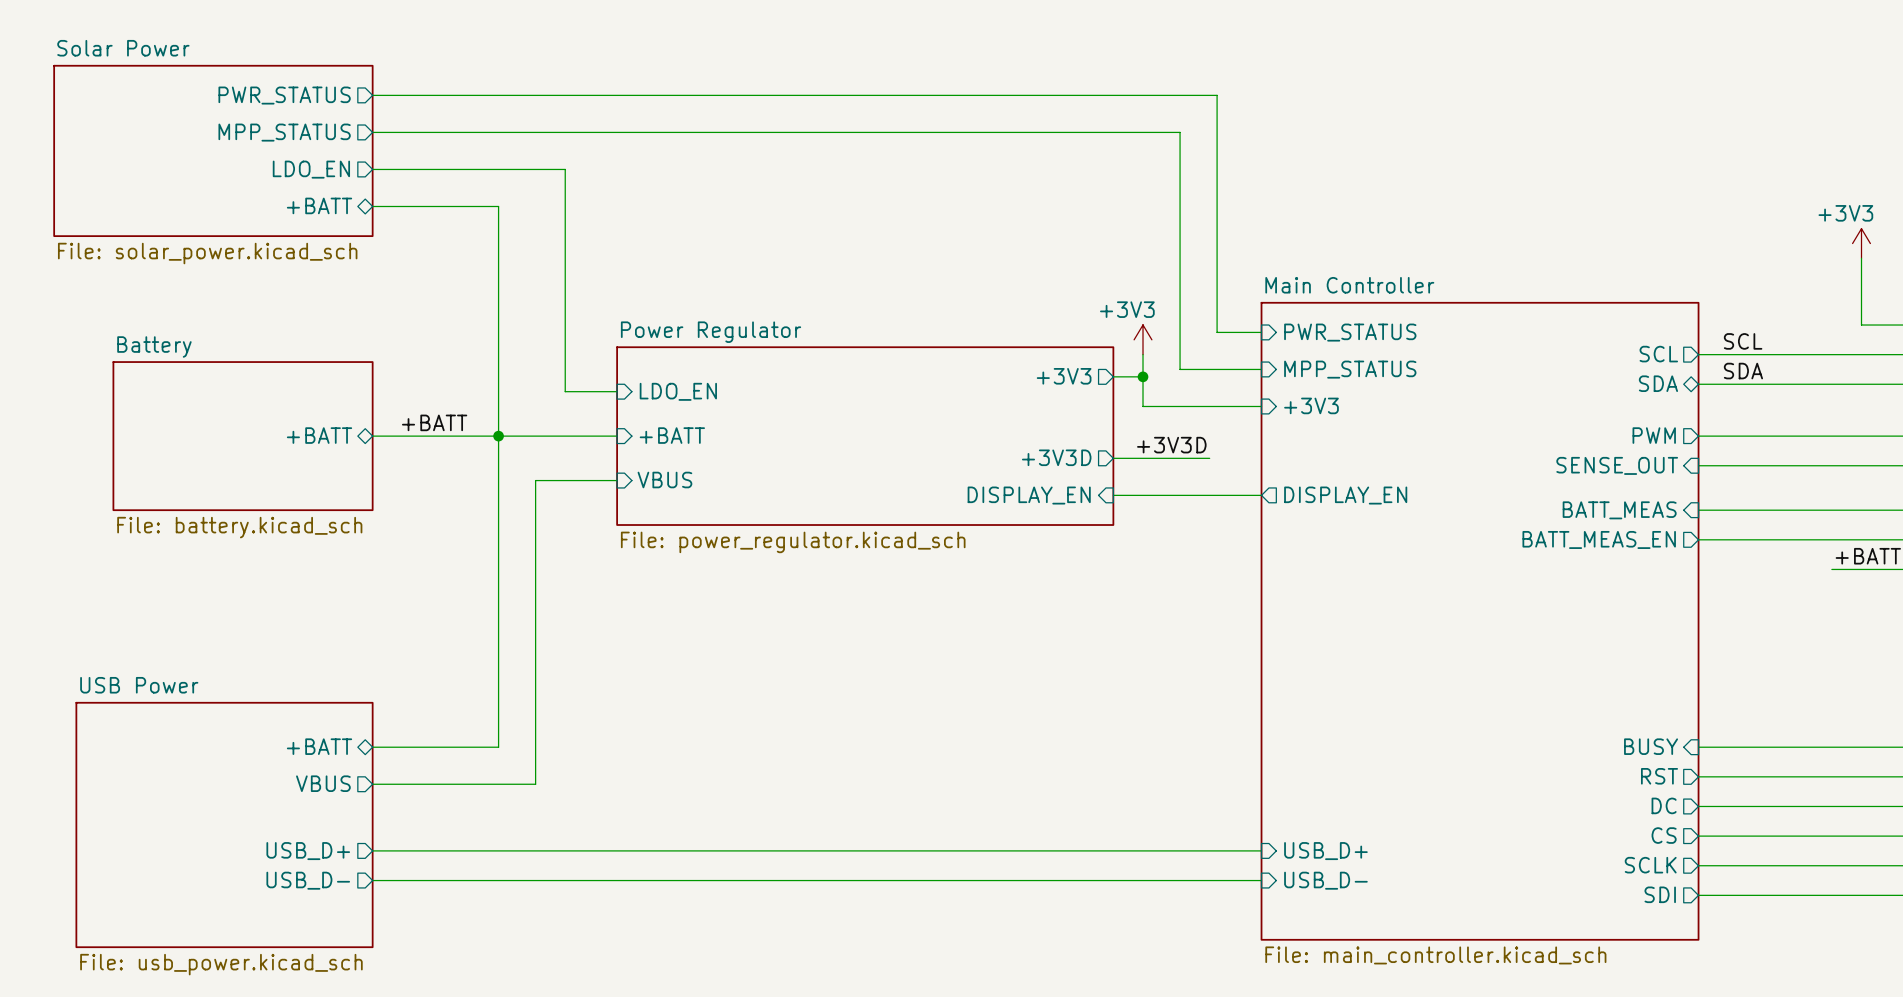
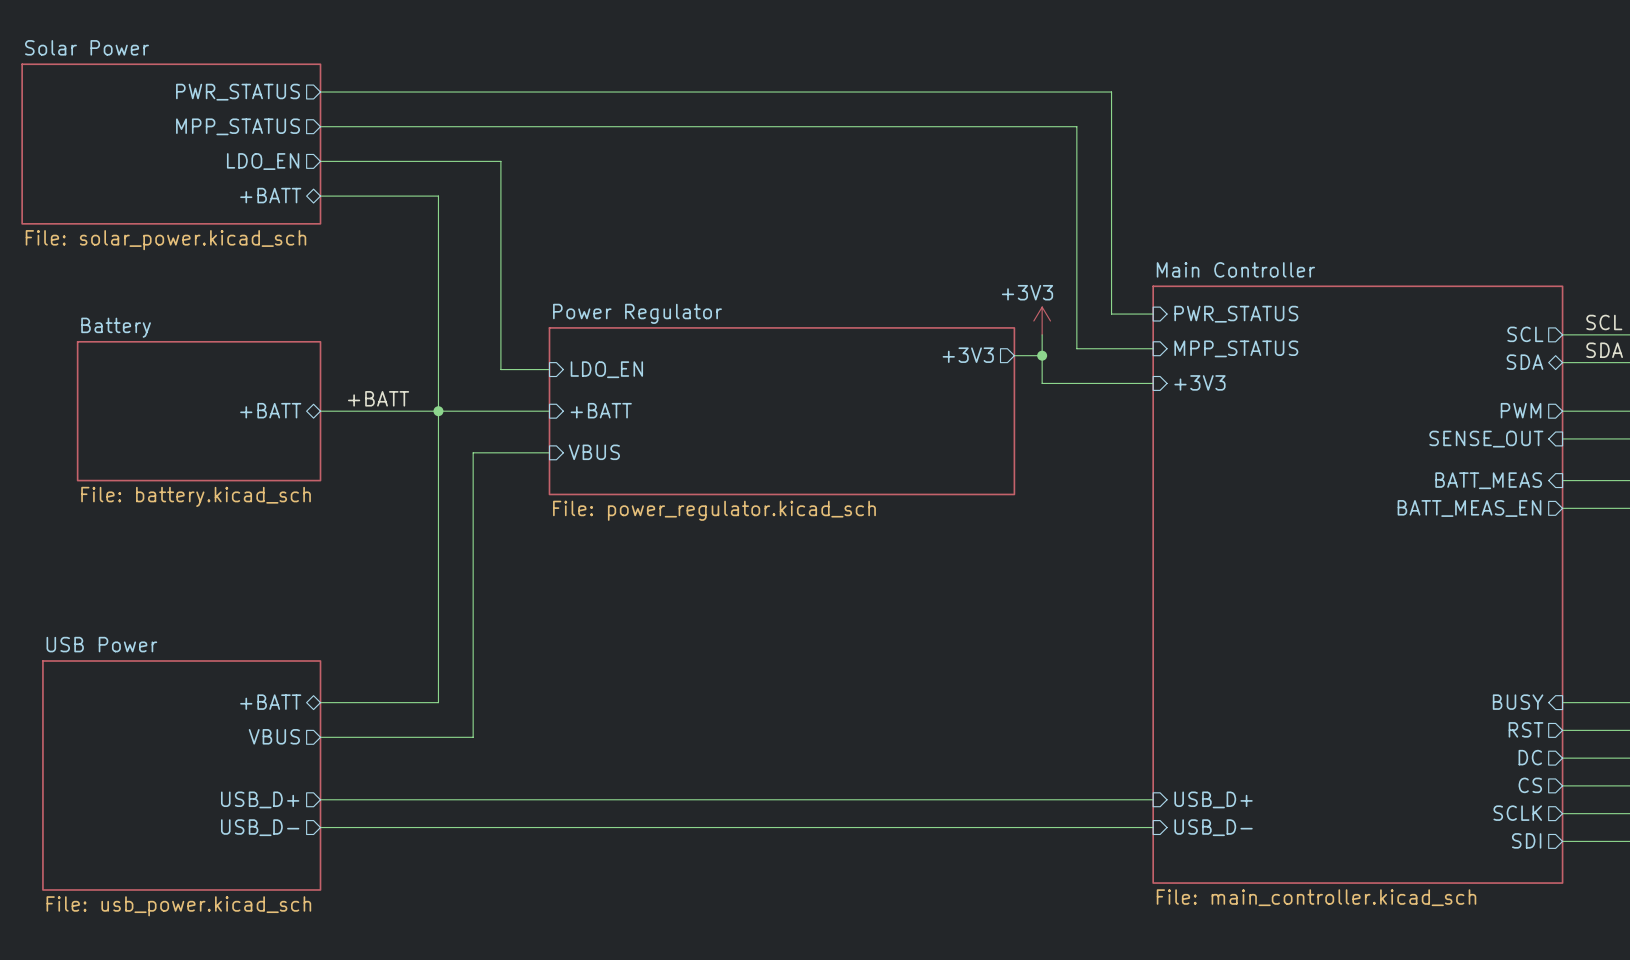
label: +3V3D (1171, 445) -> none
sheet pin: +3V3D (1056, 457) -> none
wire: (1113, 458) (1209, 458) -> none
sheet pin: DISPLAY_EN (1029, 495) -> none
wire: (1113, 495) (1261, 495) -> none
sheet pin: DISPLAY_EN (1345, 495) -> none

